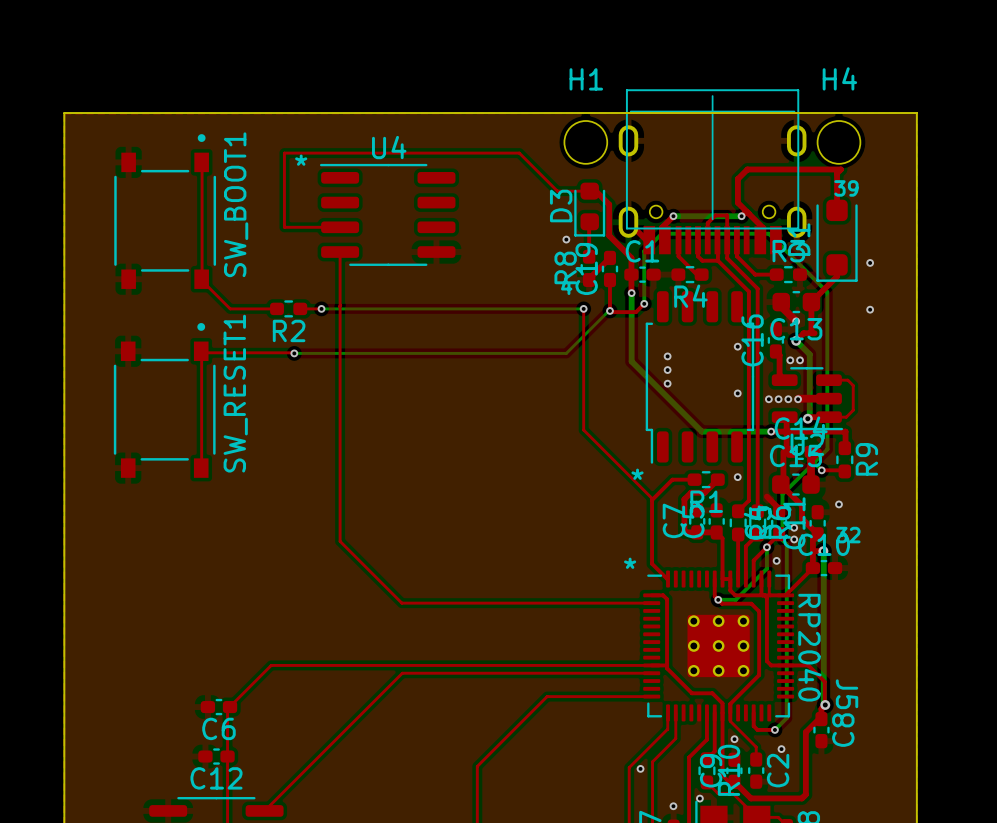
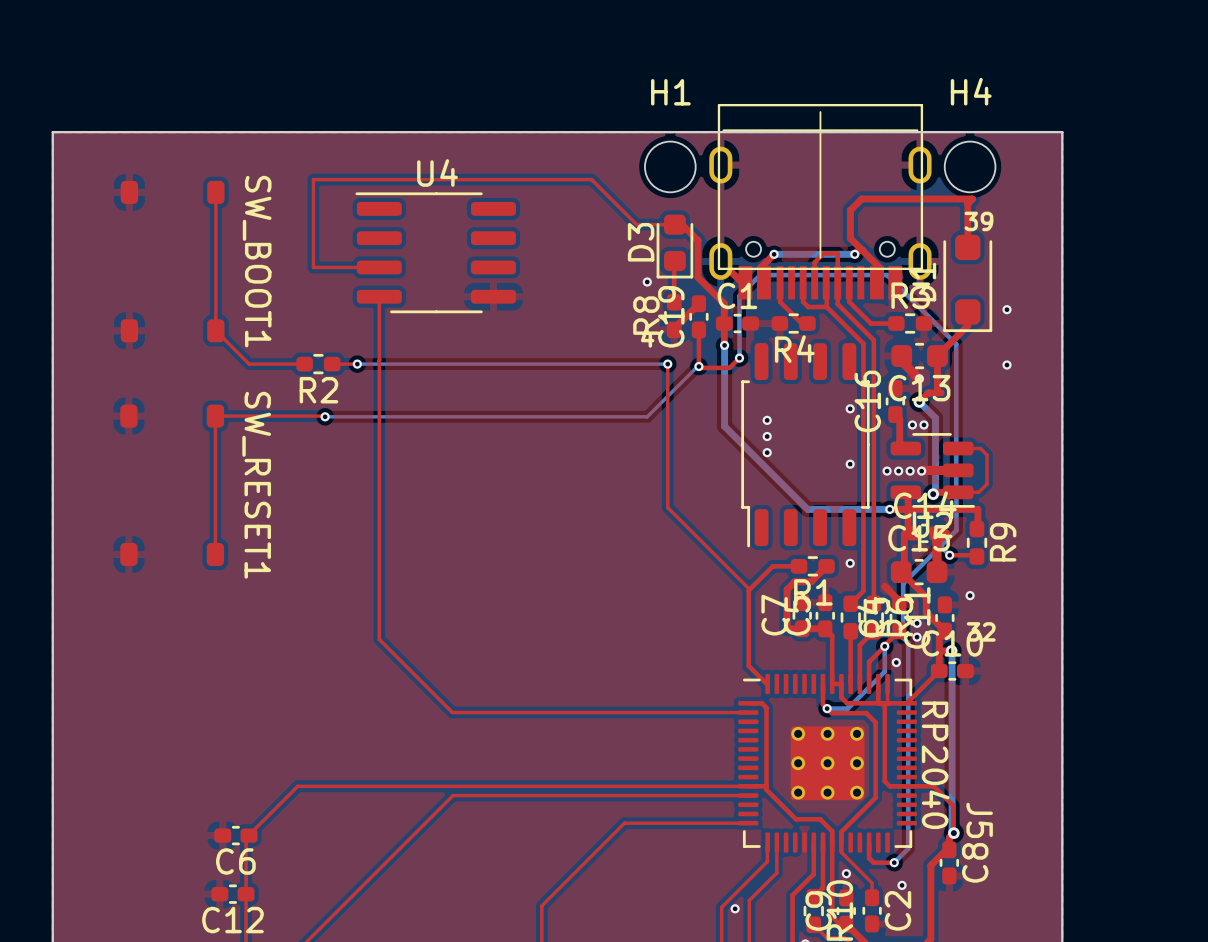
SW_BOOT1 footprint: [114, 134, 217, 289] -> [120, 180, 225, 343]
text: * (301, 160) -> none
SW_RESET1 footprint: [113, 323, 216, 478] -> [120, 404, 225, 566]
text: * (637, 474) -> none
text: * (630, 563) -> none

